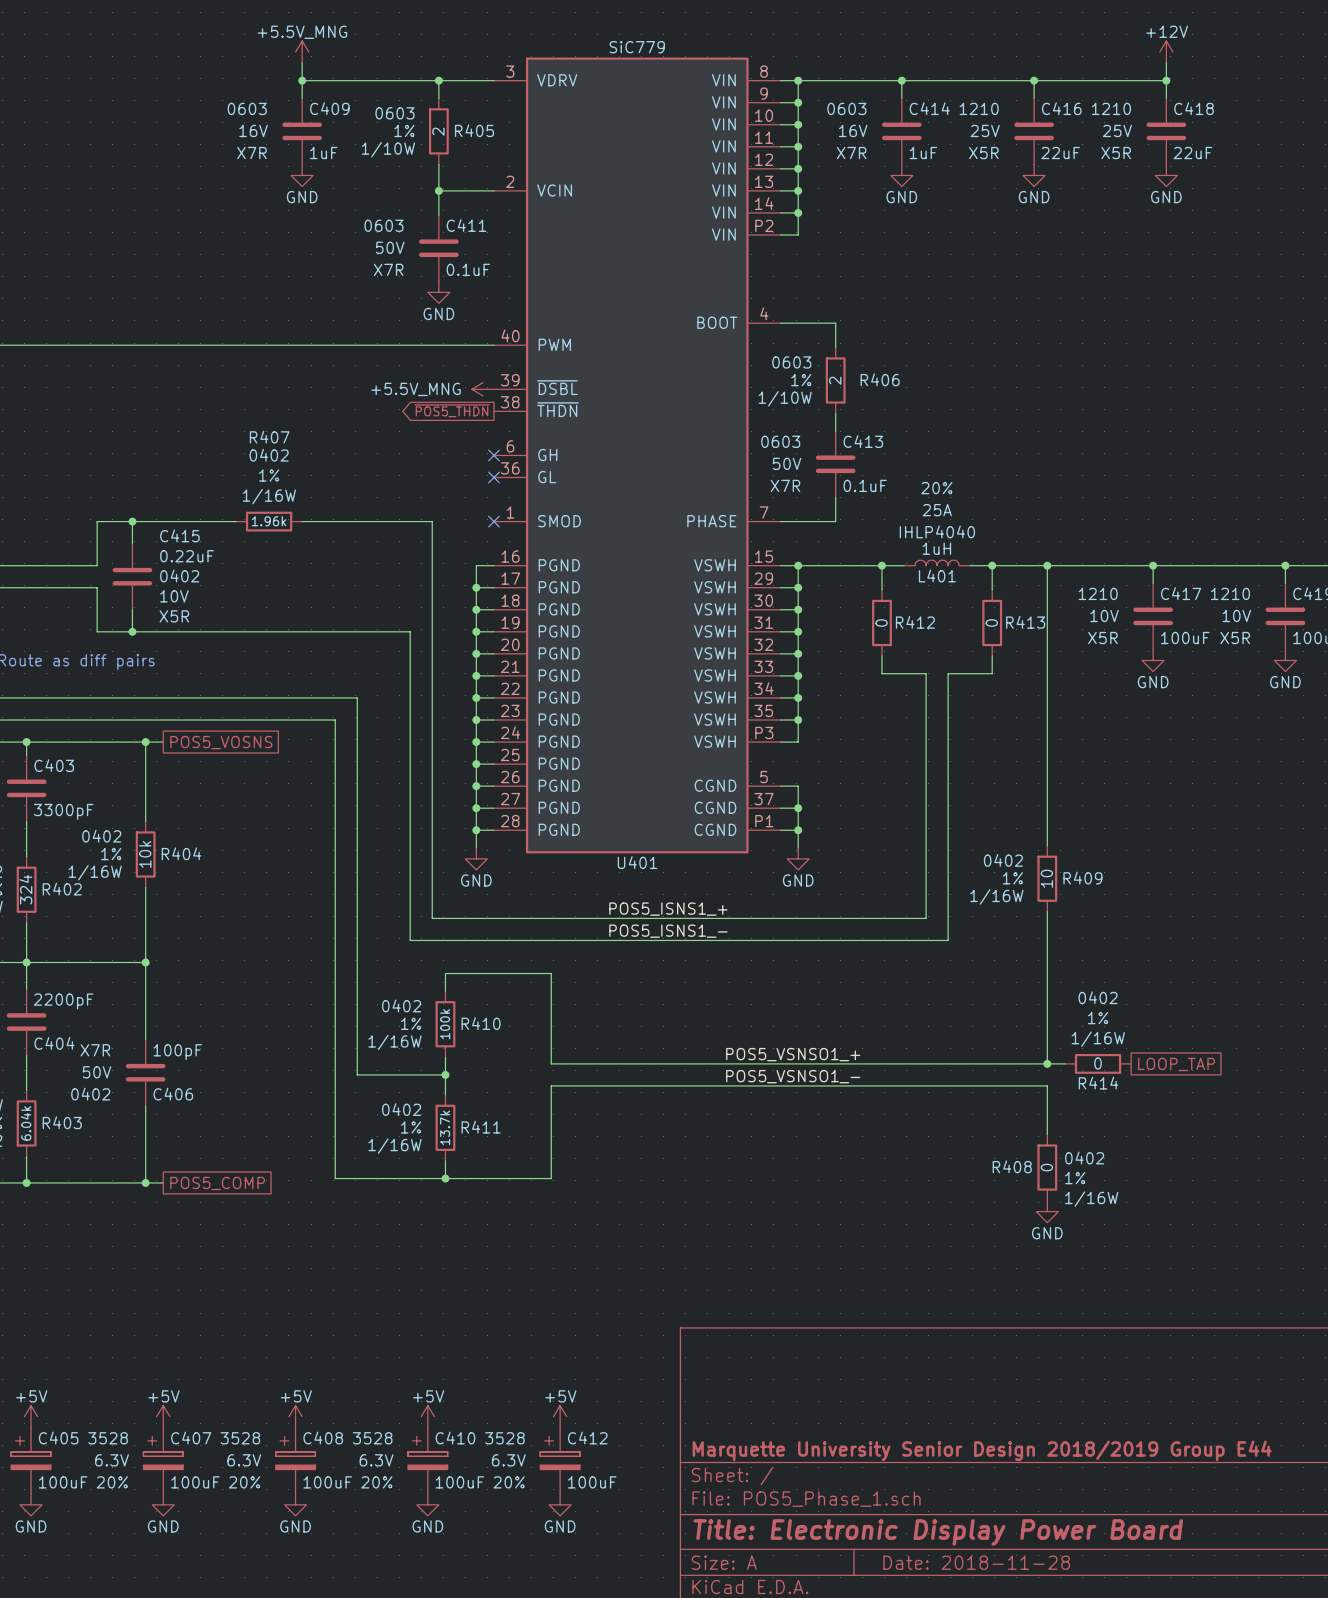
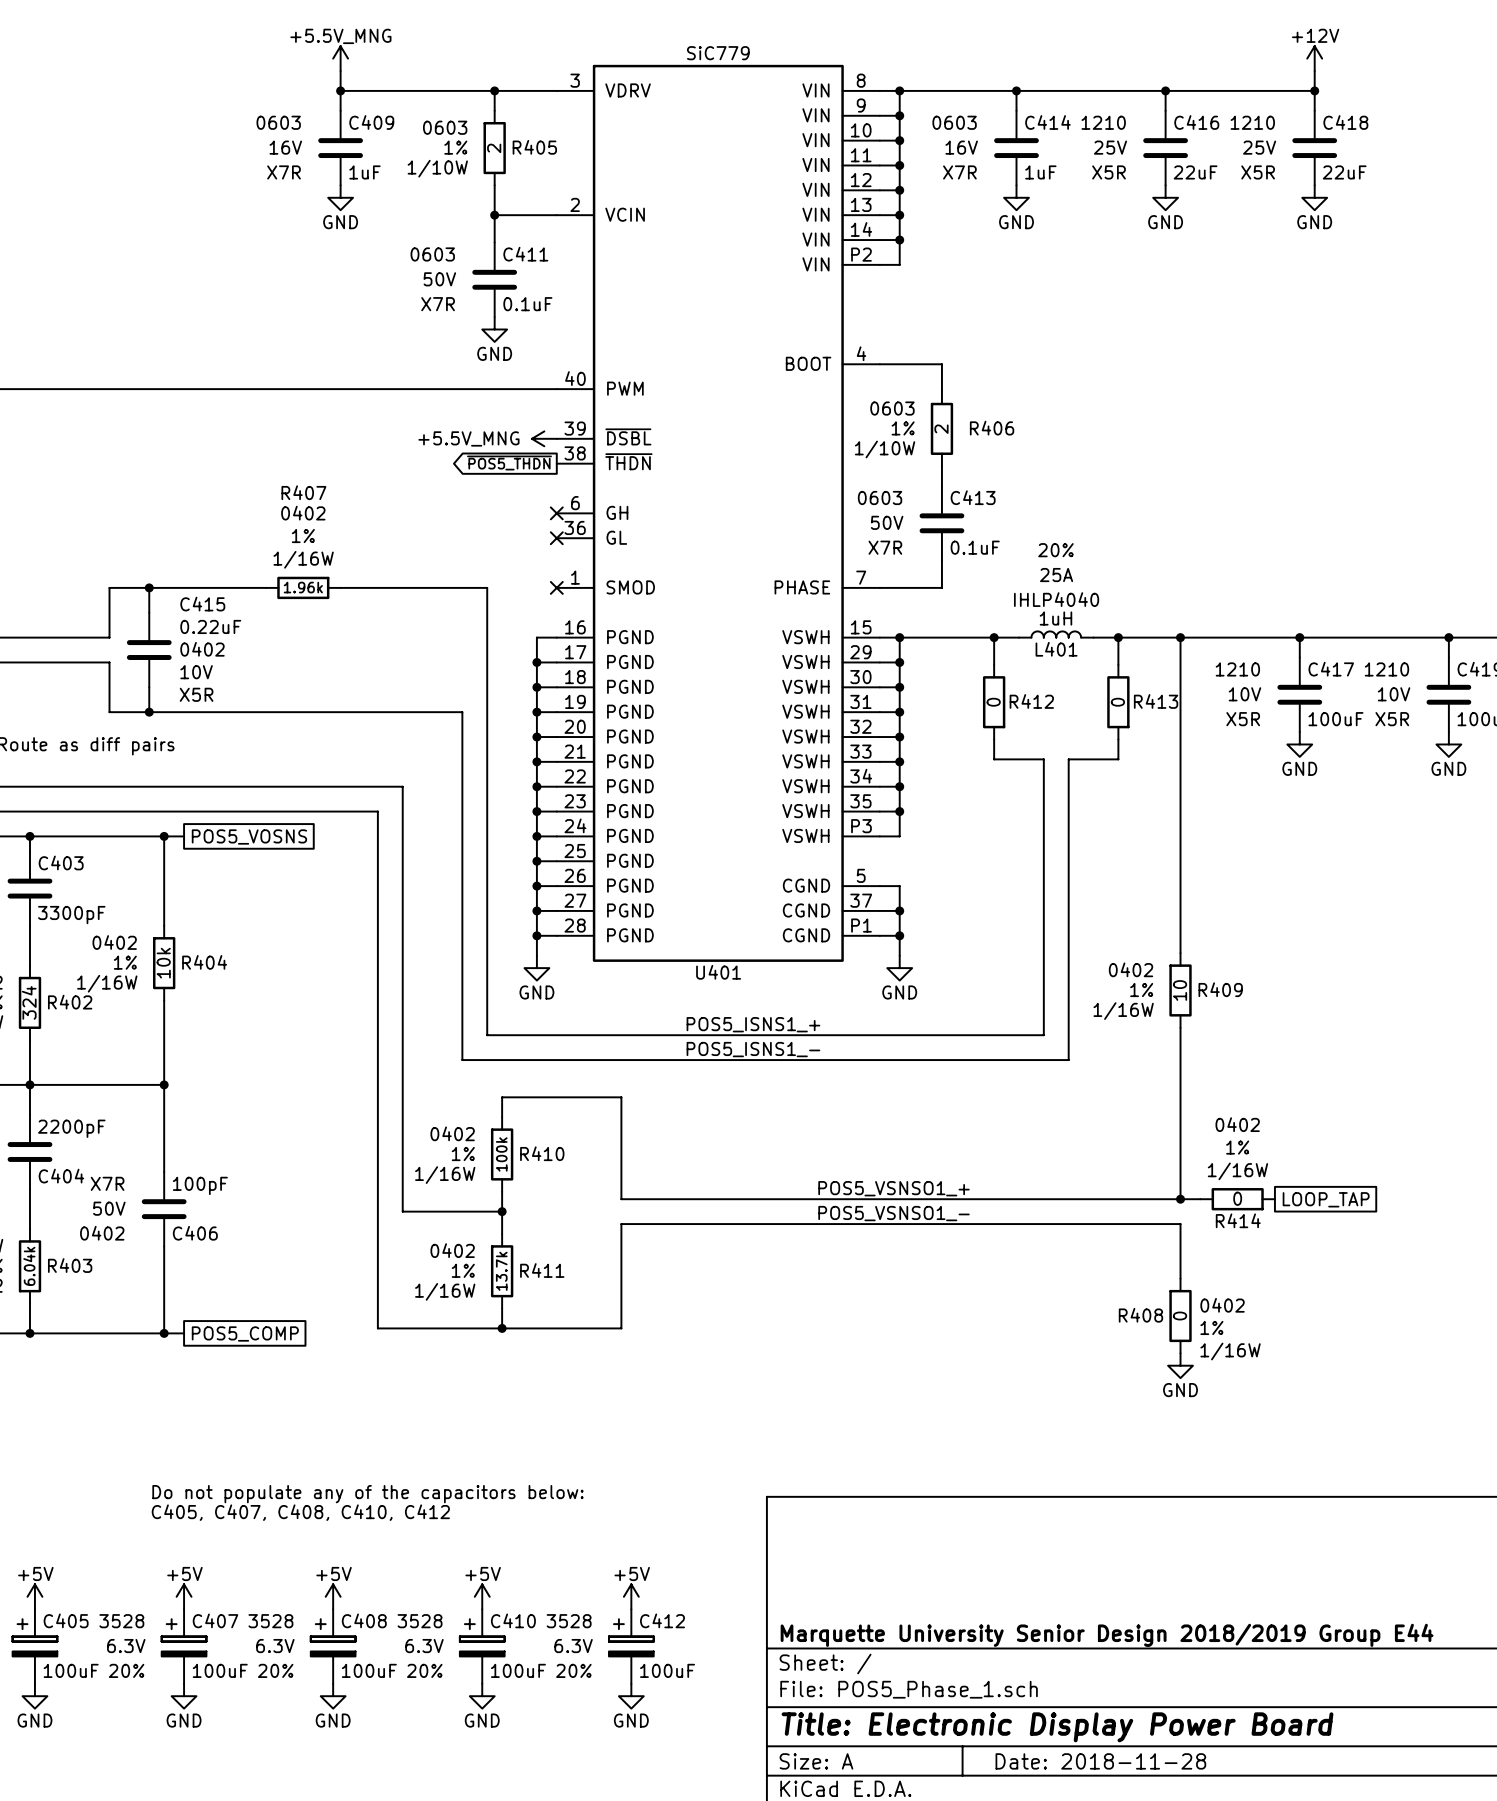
text: none -> Do not populate any of the capacitors below: (367, 1494)
text: none -> C405, C407, C408, C410, C412 (300, 1512)

